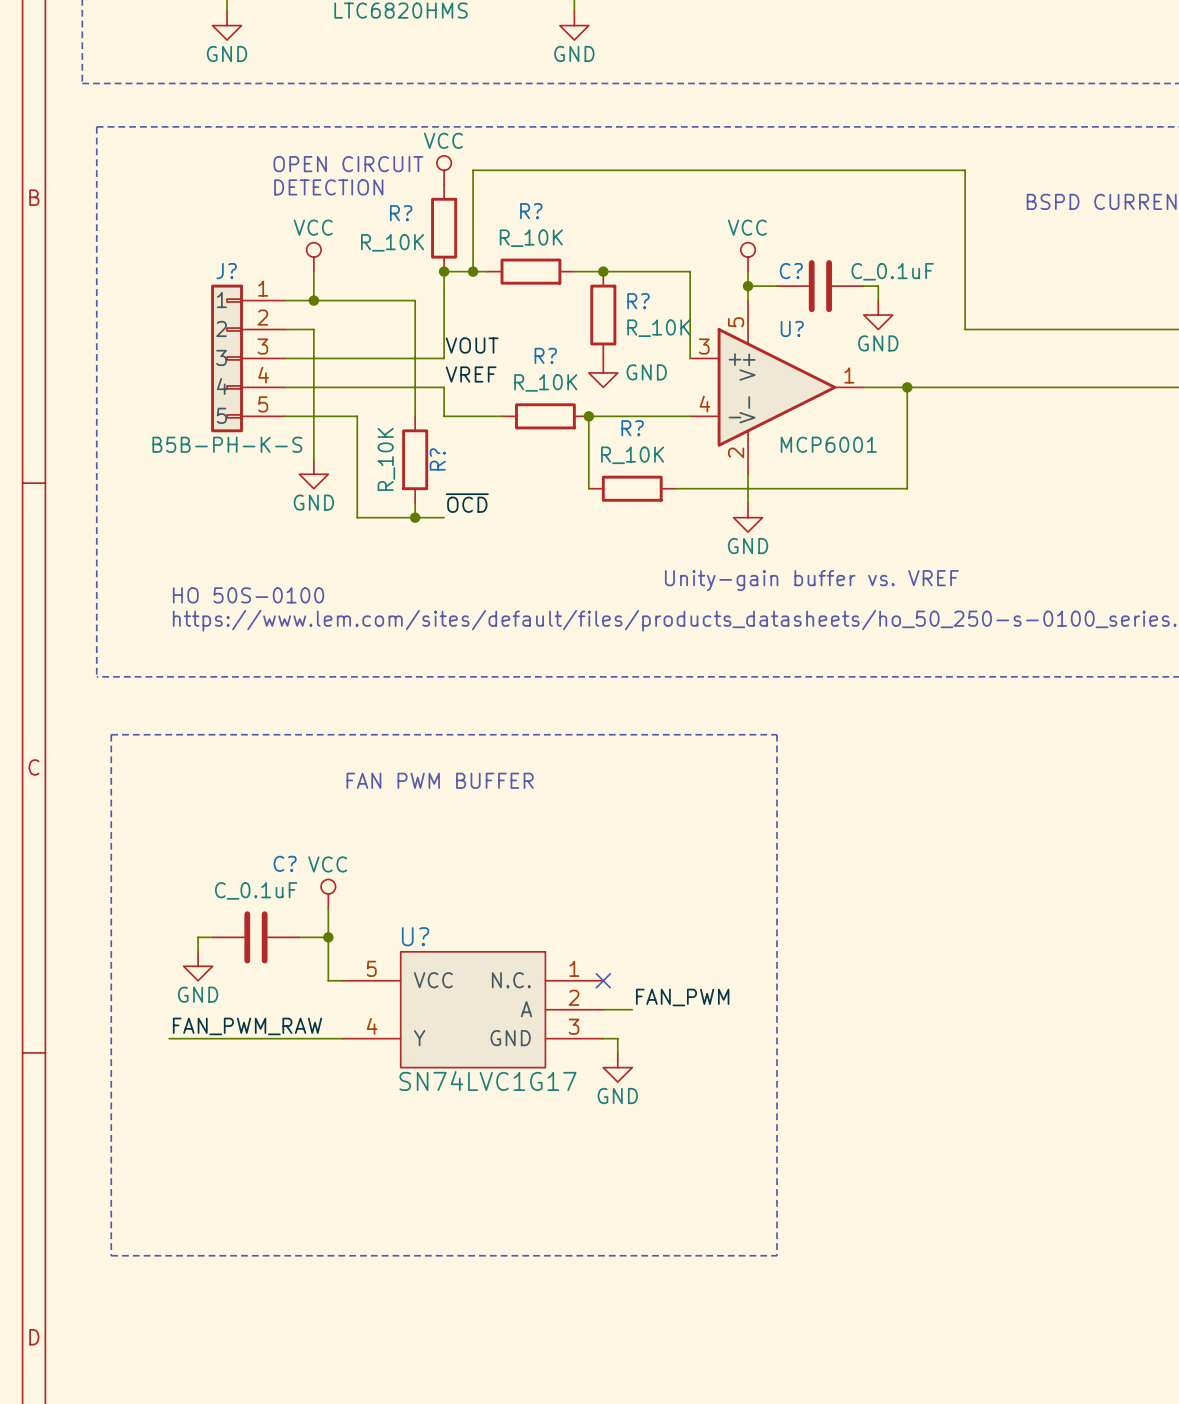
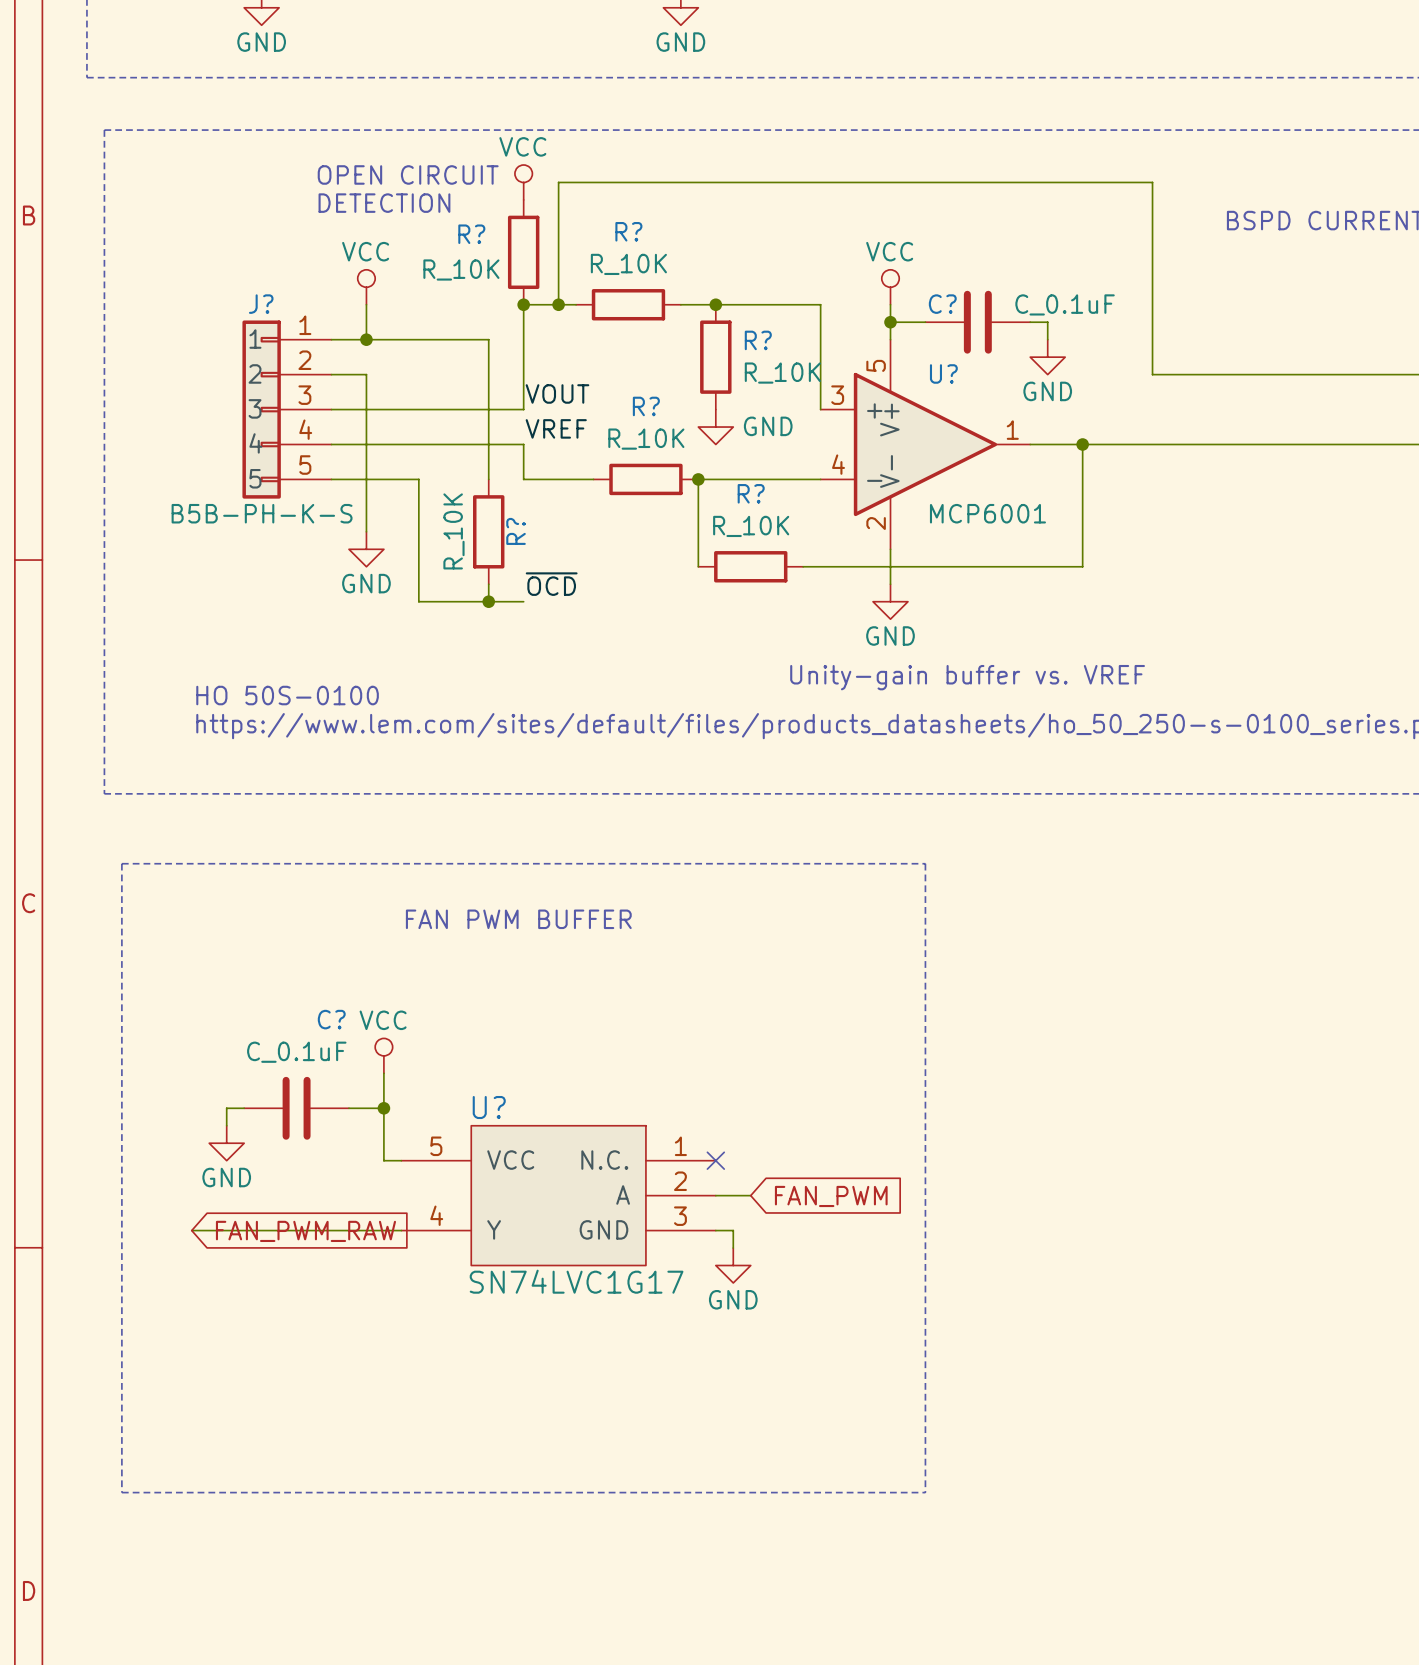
label: FAN_PWM (682, 997) -> none
global label: none -> FAN_PWM (831, 1196)
label: FAN_PWM_RAW (247, 1026) -> none
global label: none -> FAN_PWM_RAW (305, 1231)

